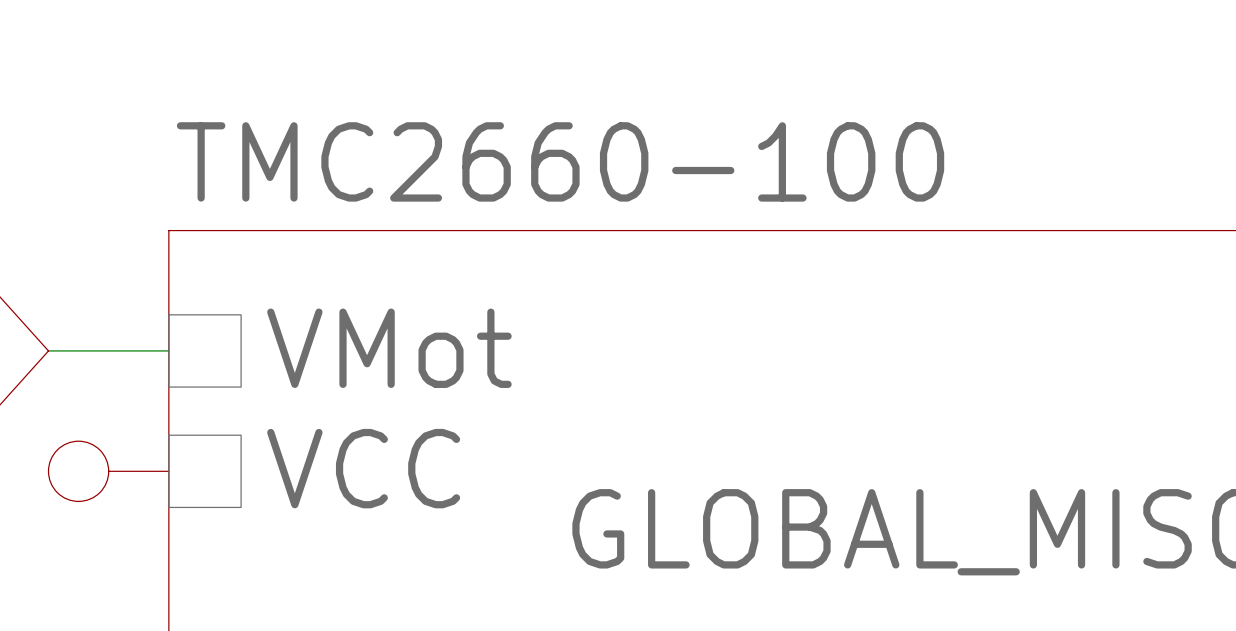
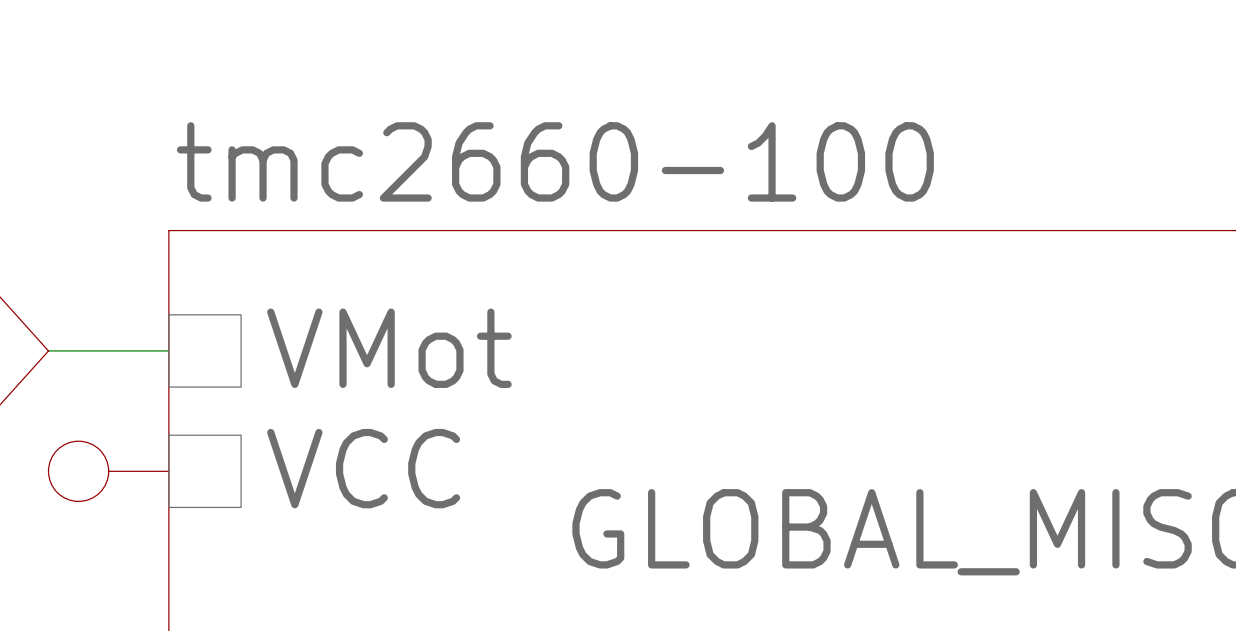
sheet TMC2660-100 name: TMC2660-100 (560, 161) -> tmc2660-100 (555, 161)

